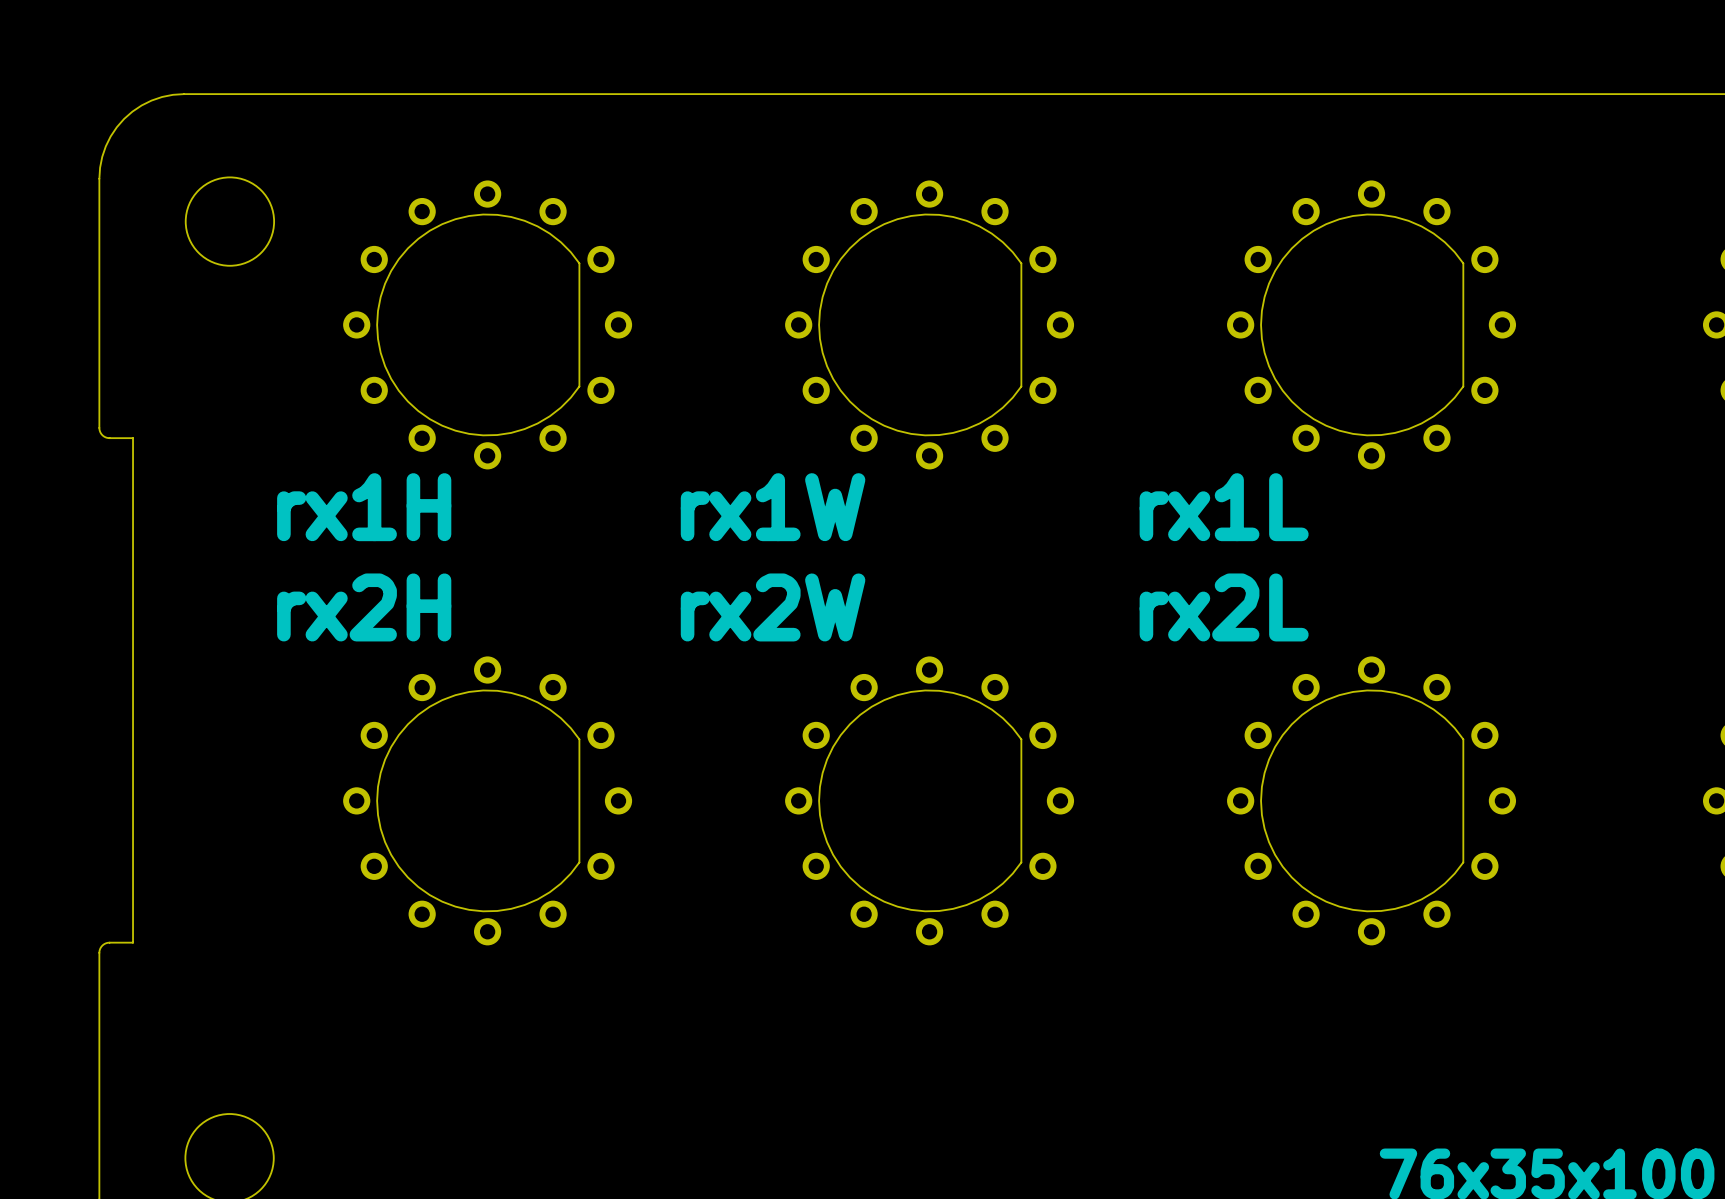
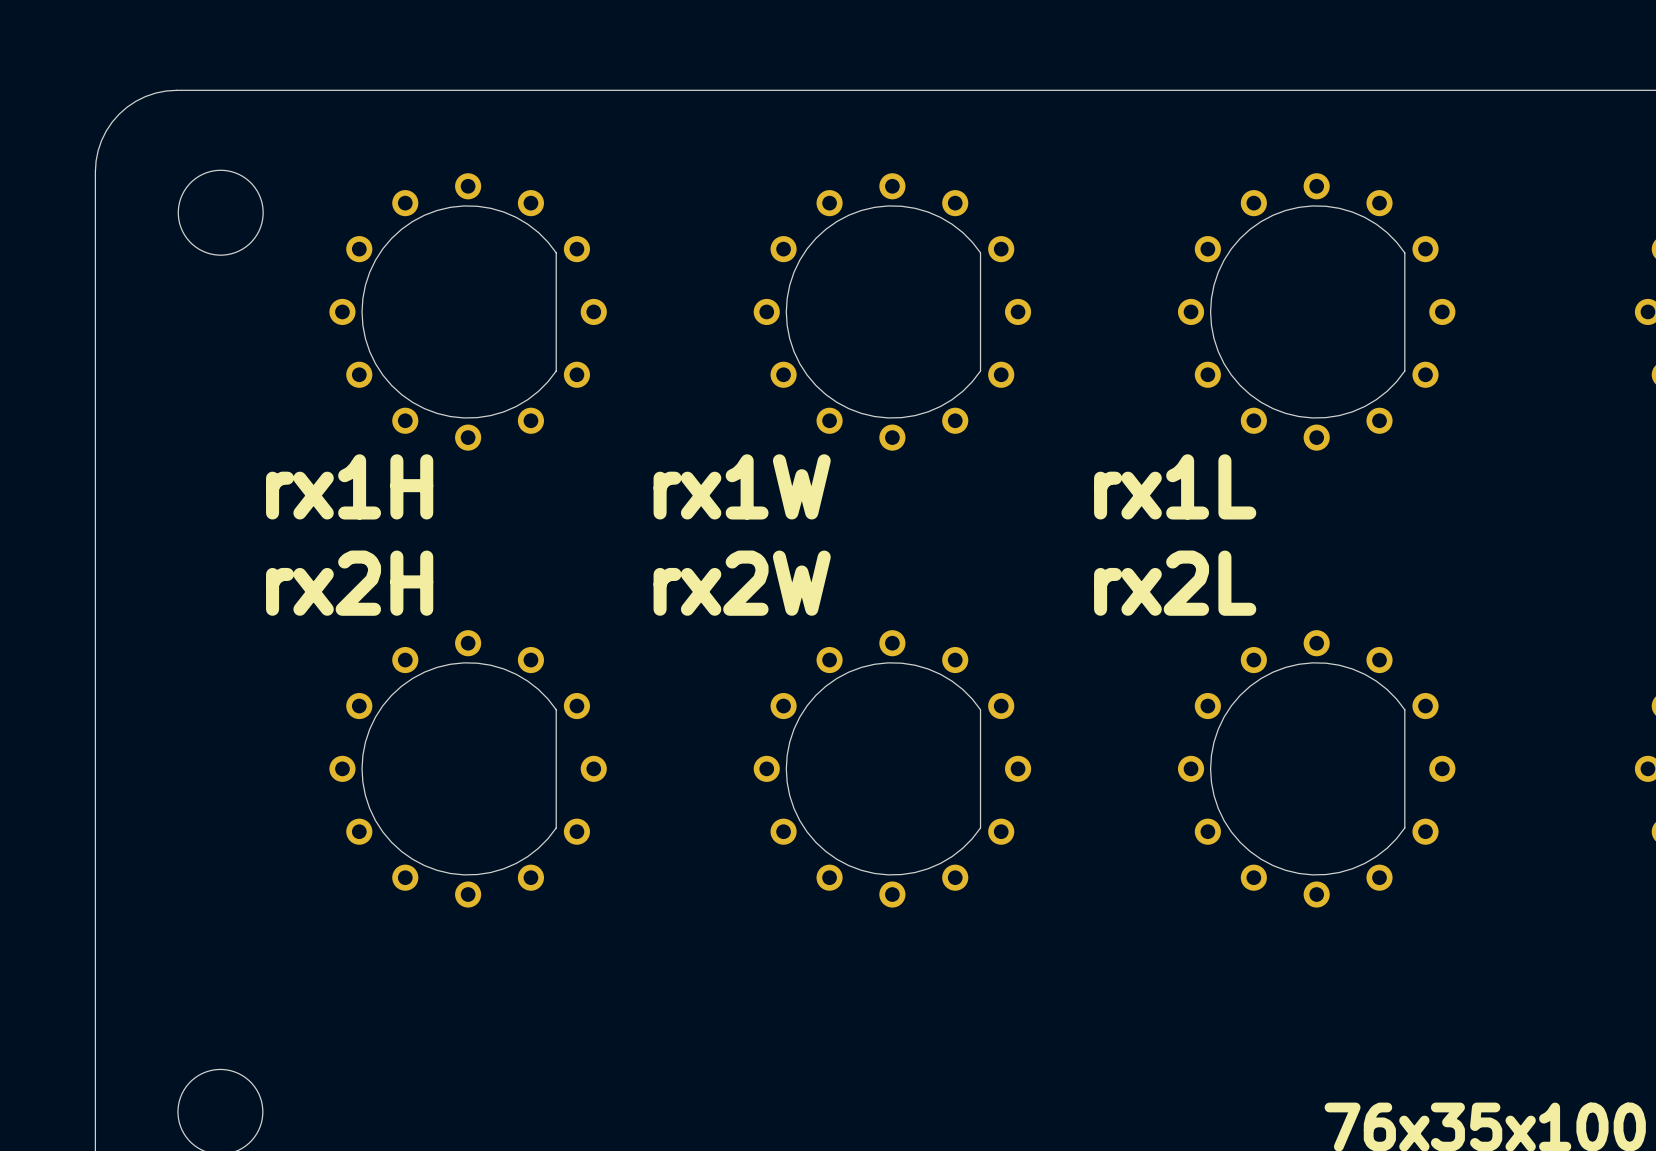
board edge: (99, 427) (101, 434) (106, 437) (133, 438) (133, 942) (106, 943) (101, 946) (99, 952) -> (95, 410) (95, 914)

